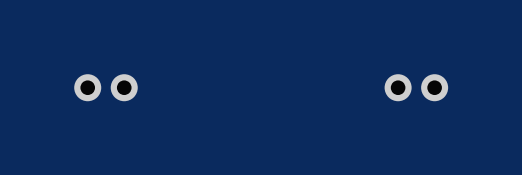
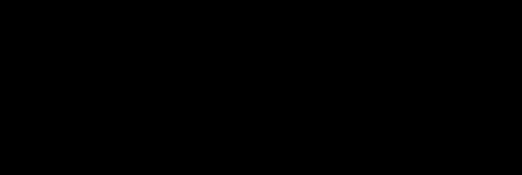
part: (105, 87) -> none
part: (416, 87) -> none

